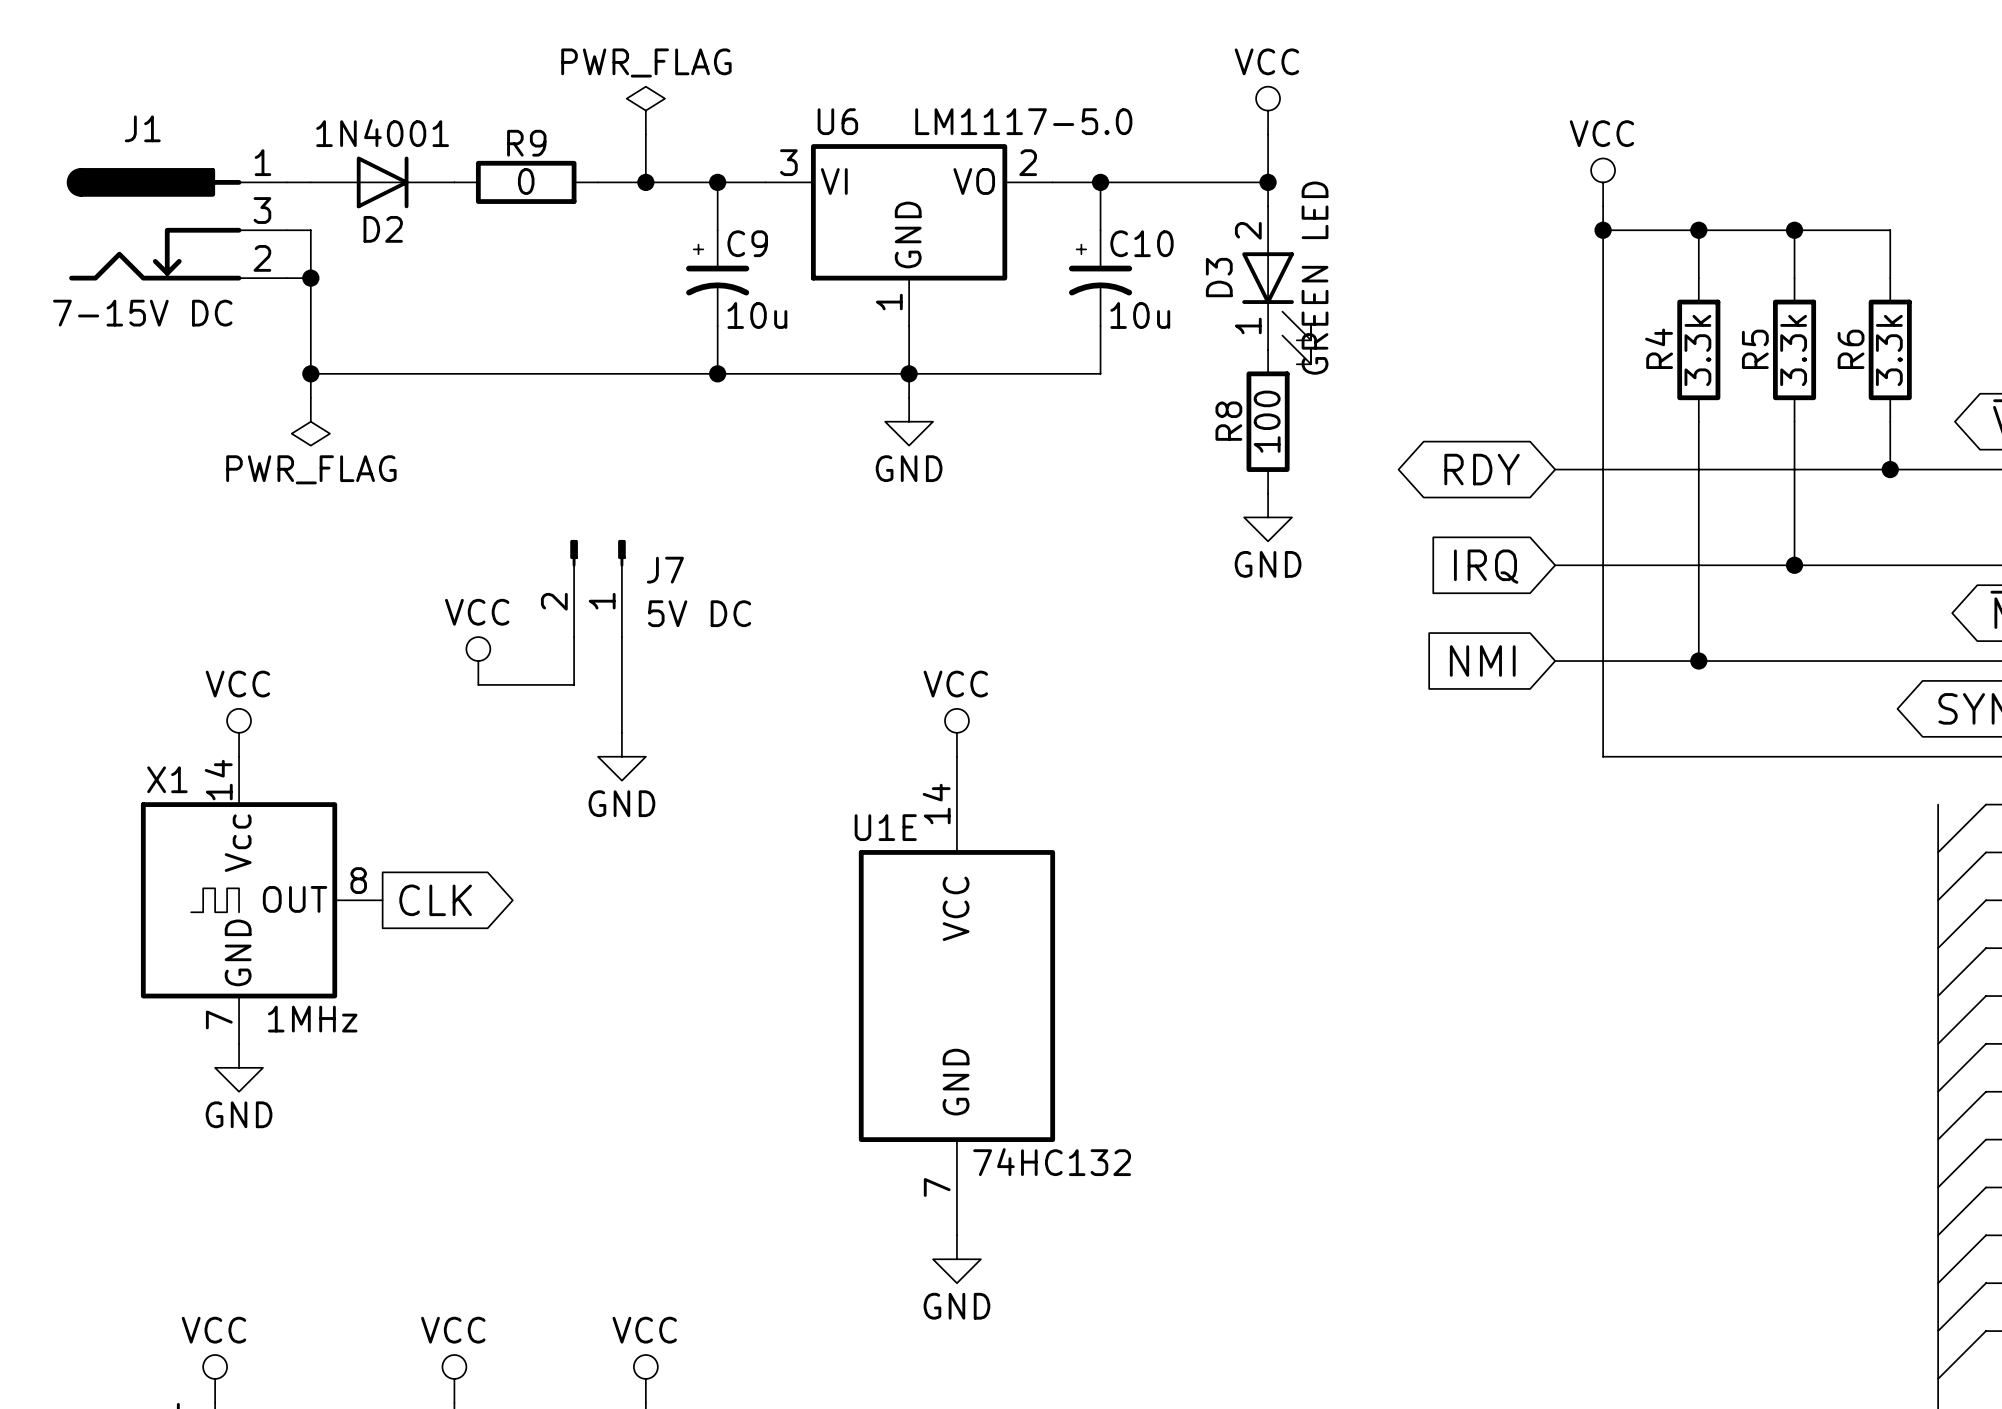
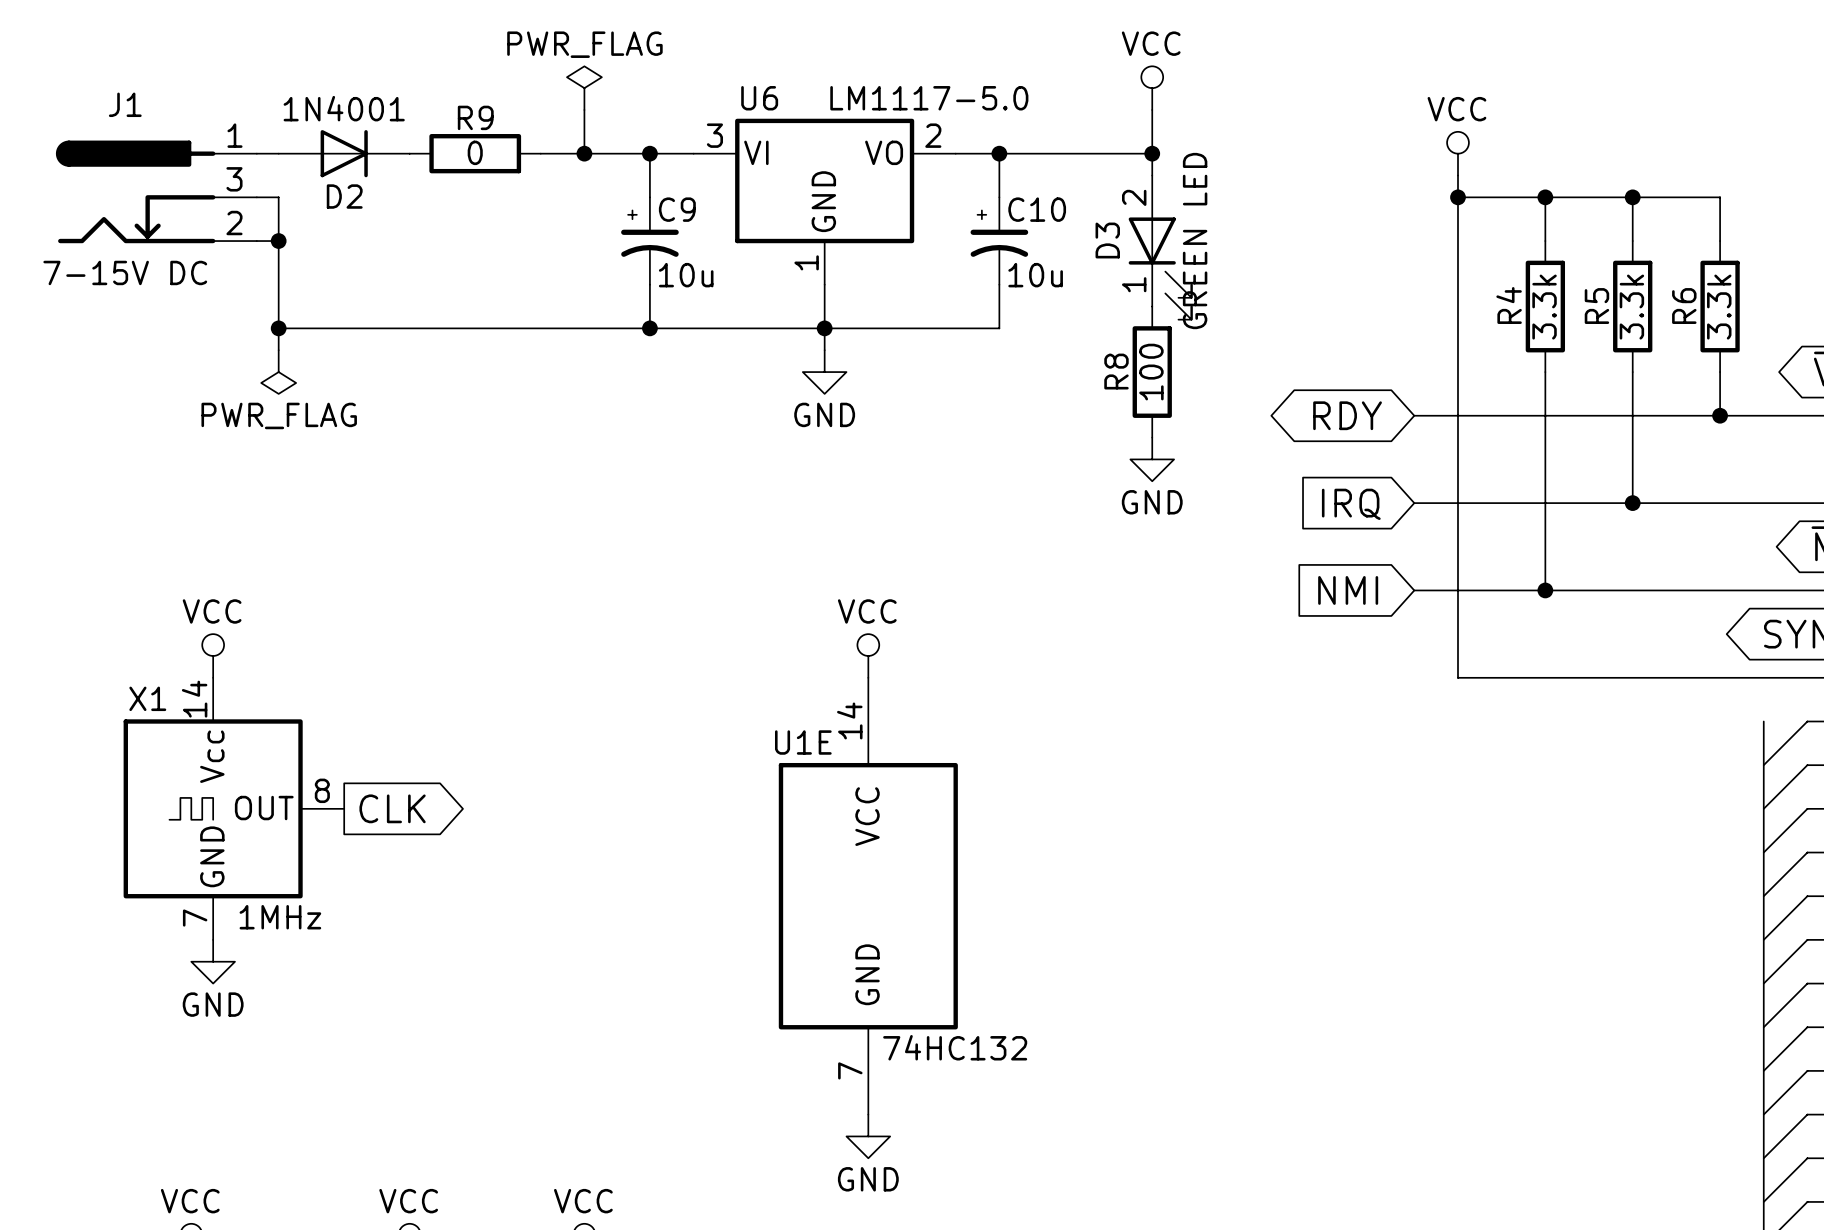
J7: 5V DC (598, 588) -> none
wire: (574, 637) (574, 684) (478, 684) -> none
wire: (621, 637) (621, 732) -> none
power symbol: VCC (478, 661) -> none
power symbol: GND (621, 756) -> none

